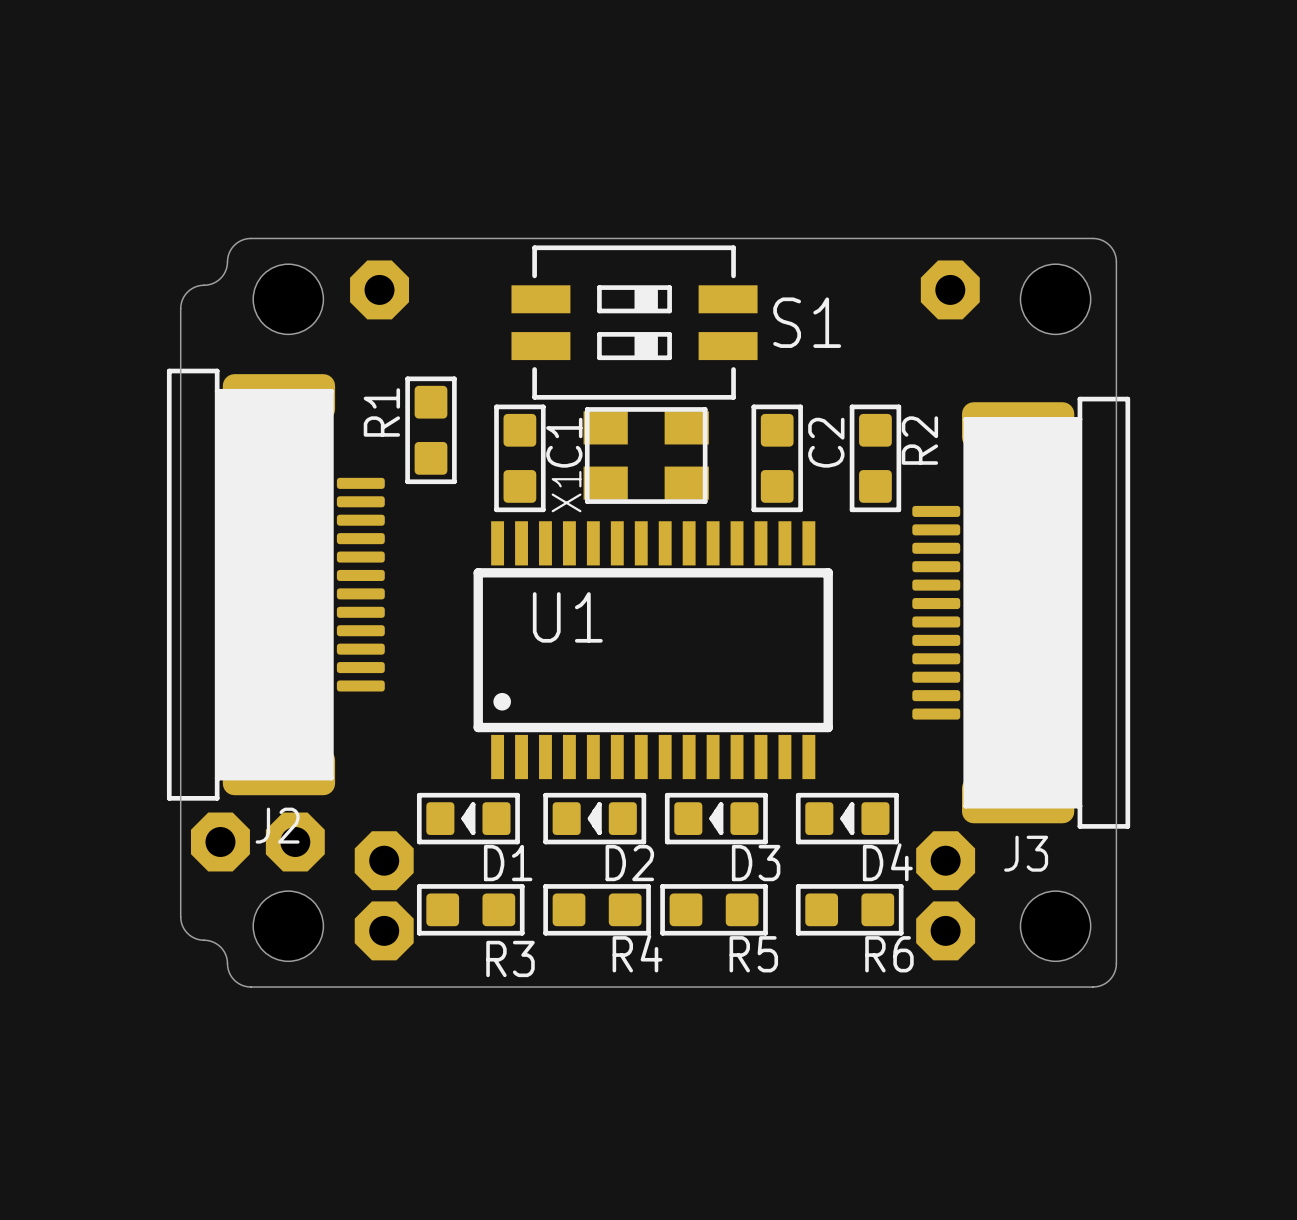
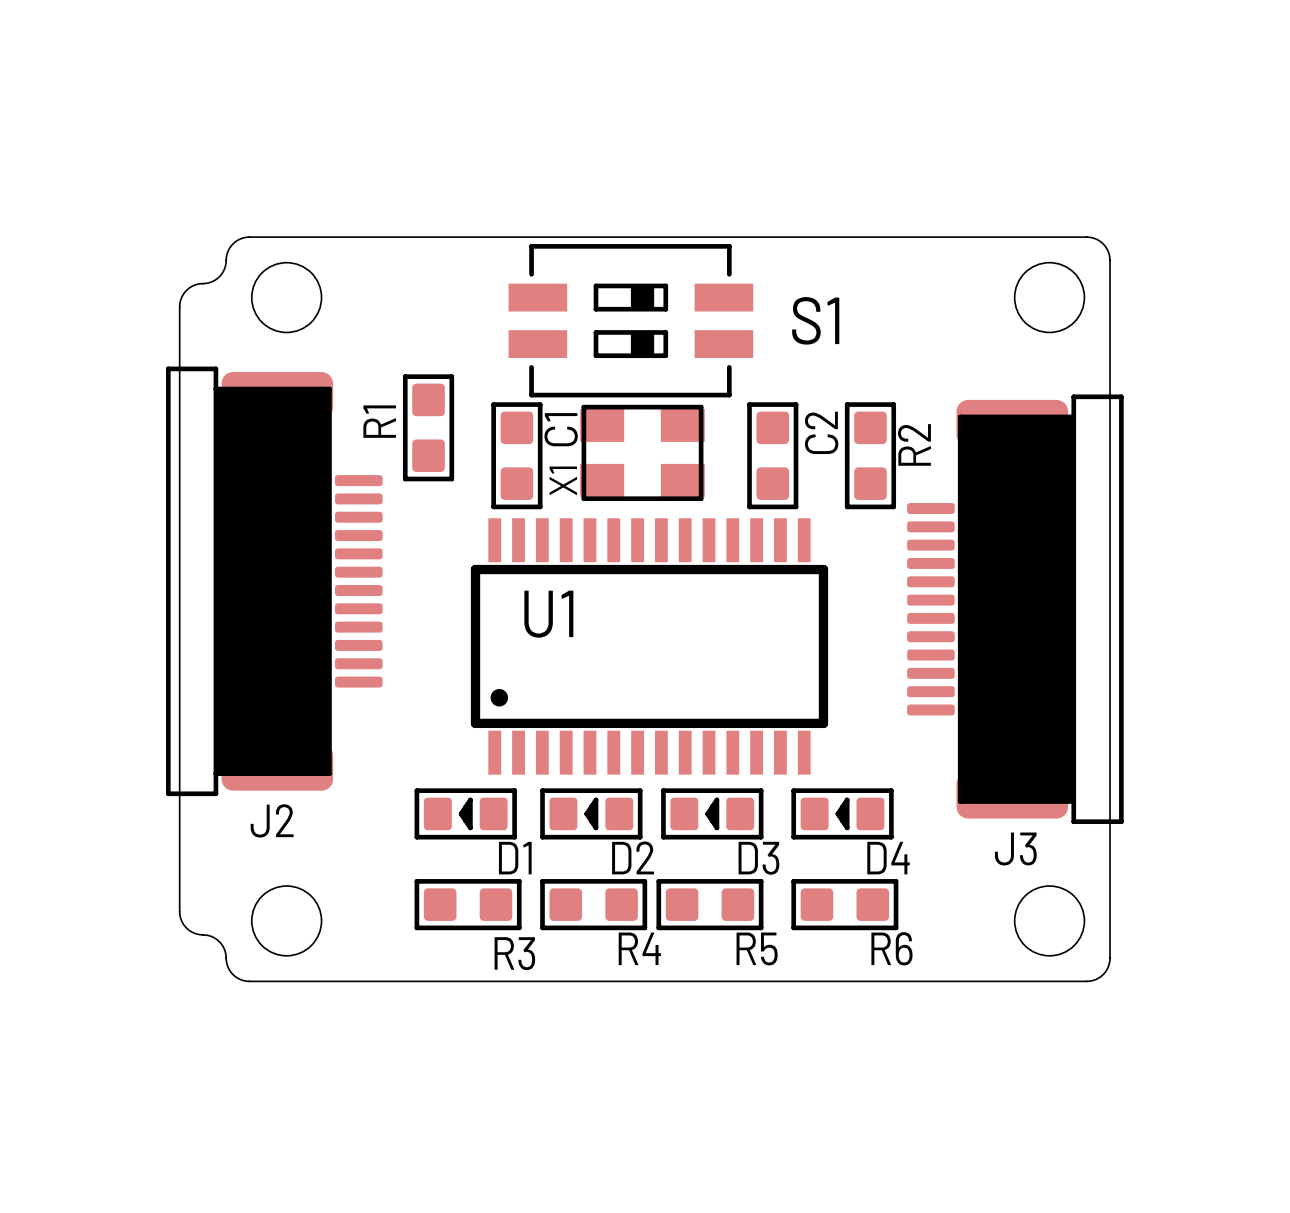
part: (379, 289) -> none
part: (950, 289) -> none
part: (220, 841) -> none
part: (295, 841) -> none
part: (384, 860) -> none
part: (945, 860) -> none
part: (384, 930) -> none
part: (945, 930) -> none

